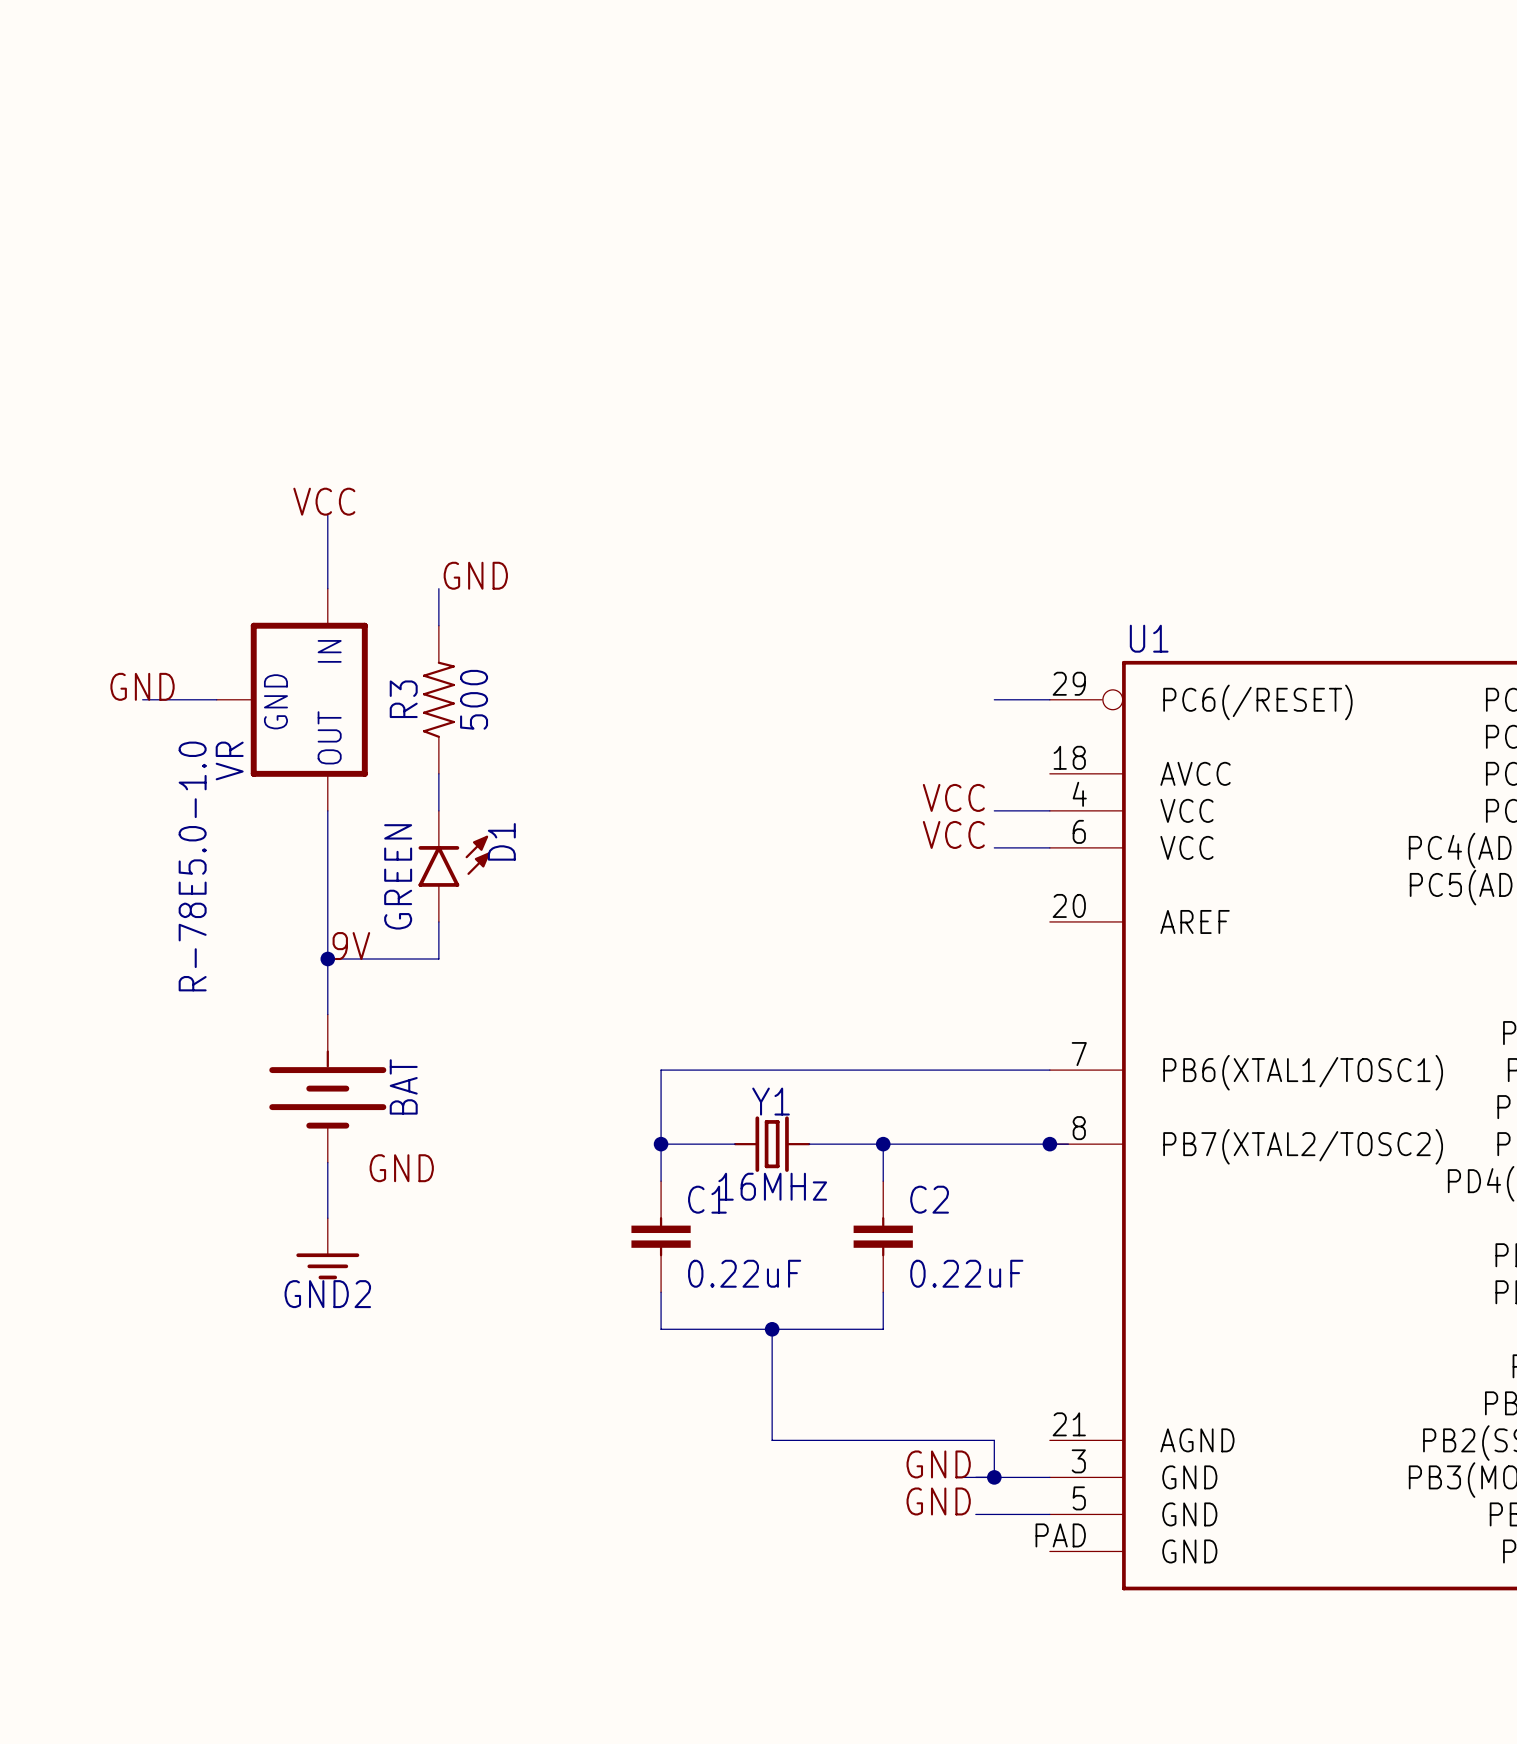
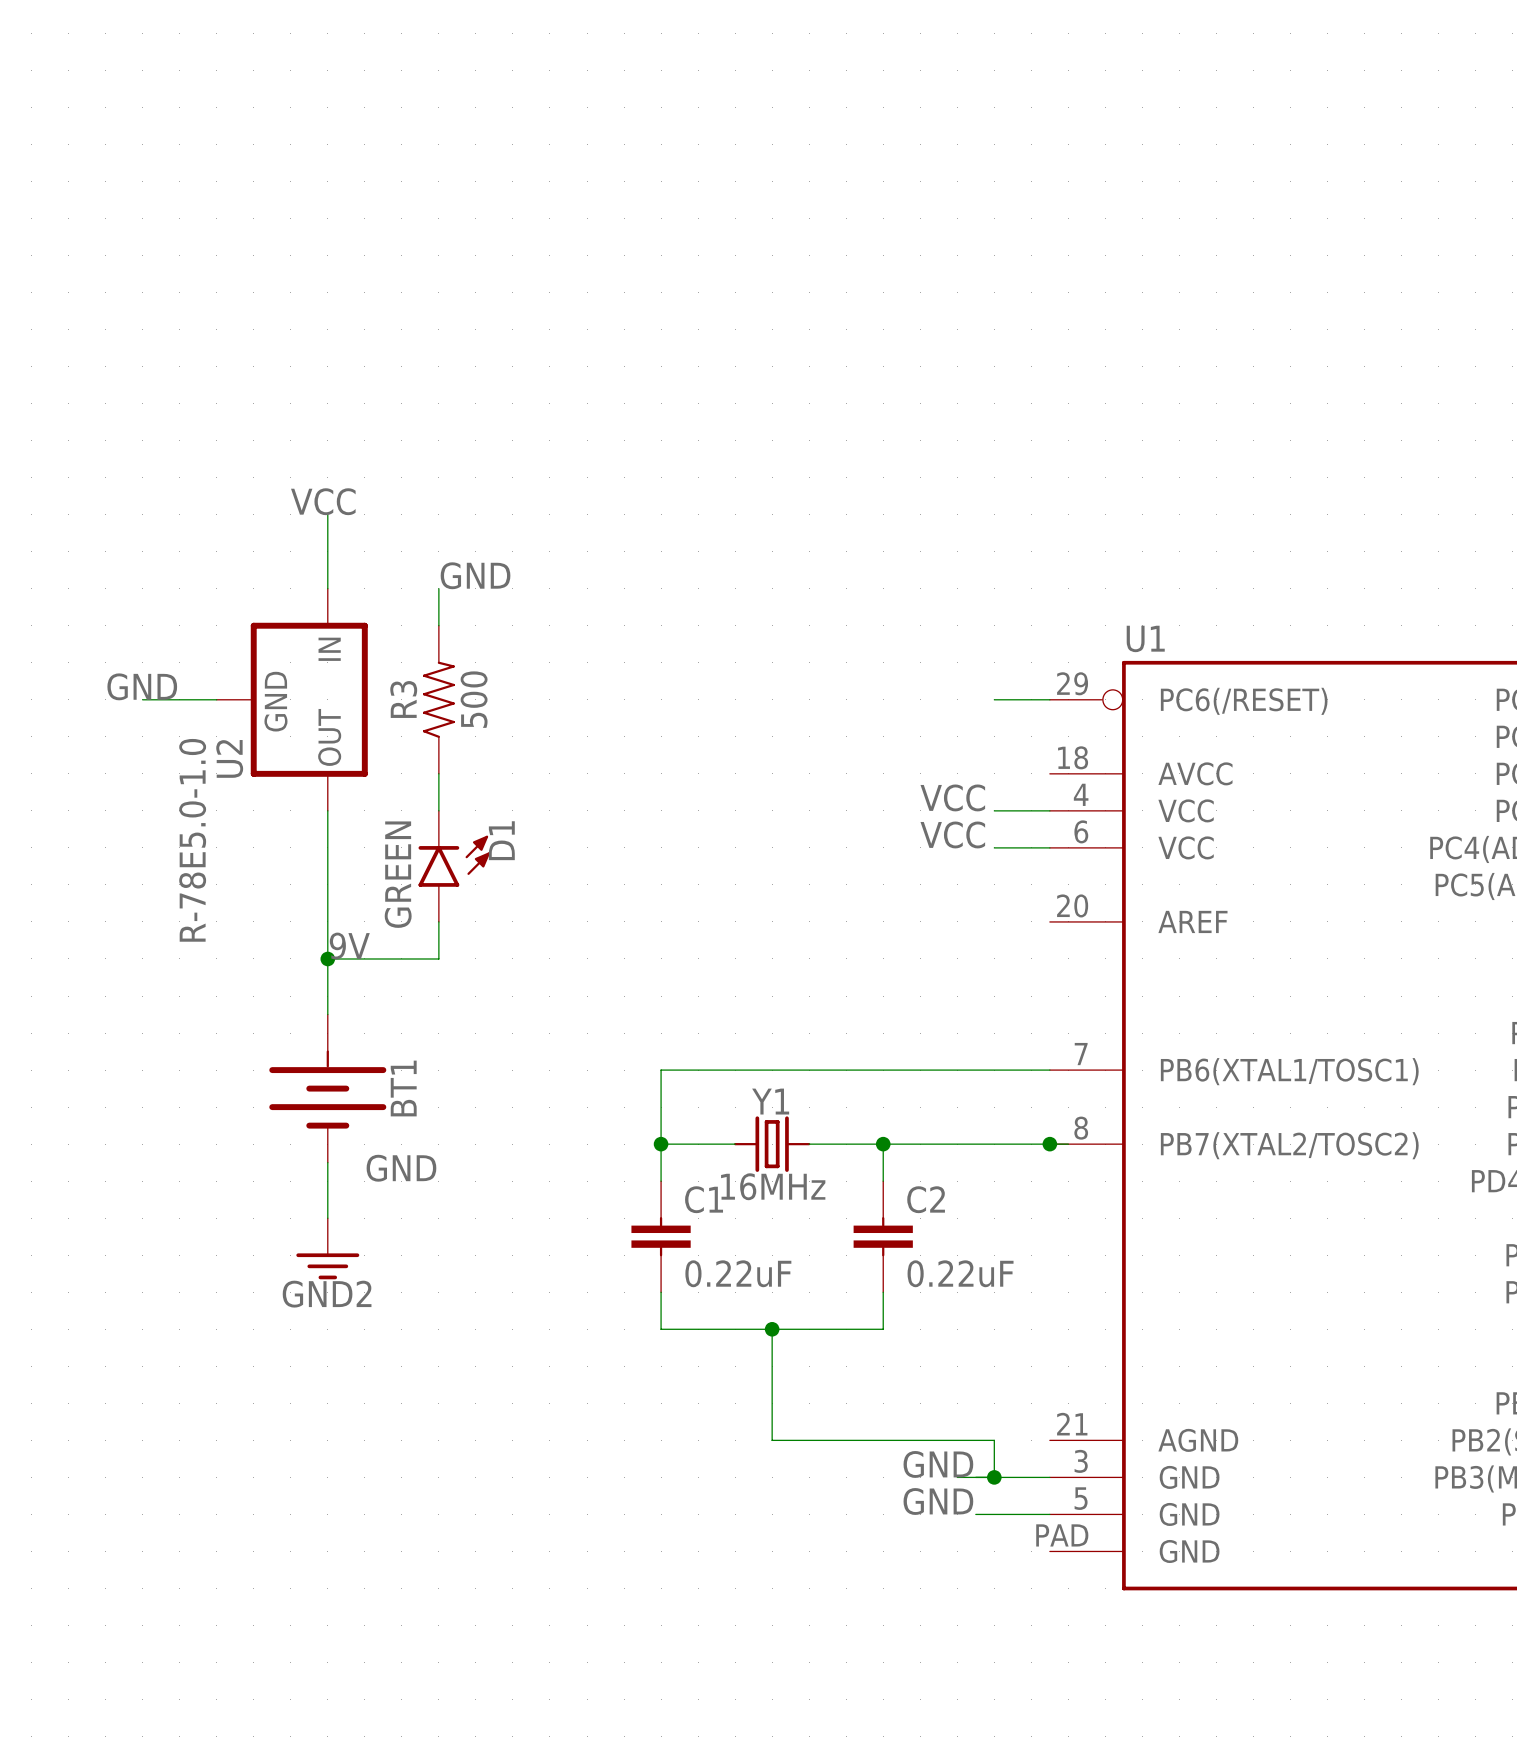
VR name: VR (229, 760) -> U2 (229, 758)
BAT name: BAT (403, 1086) -> BT1 (403, 1088)

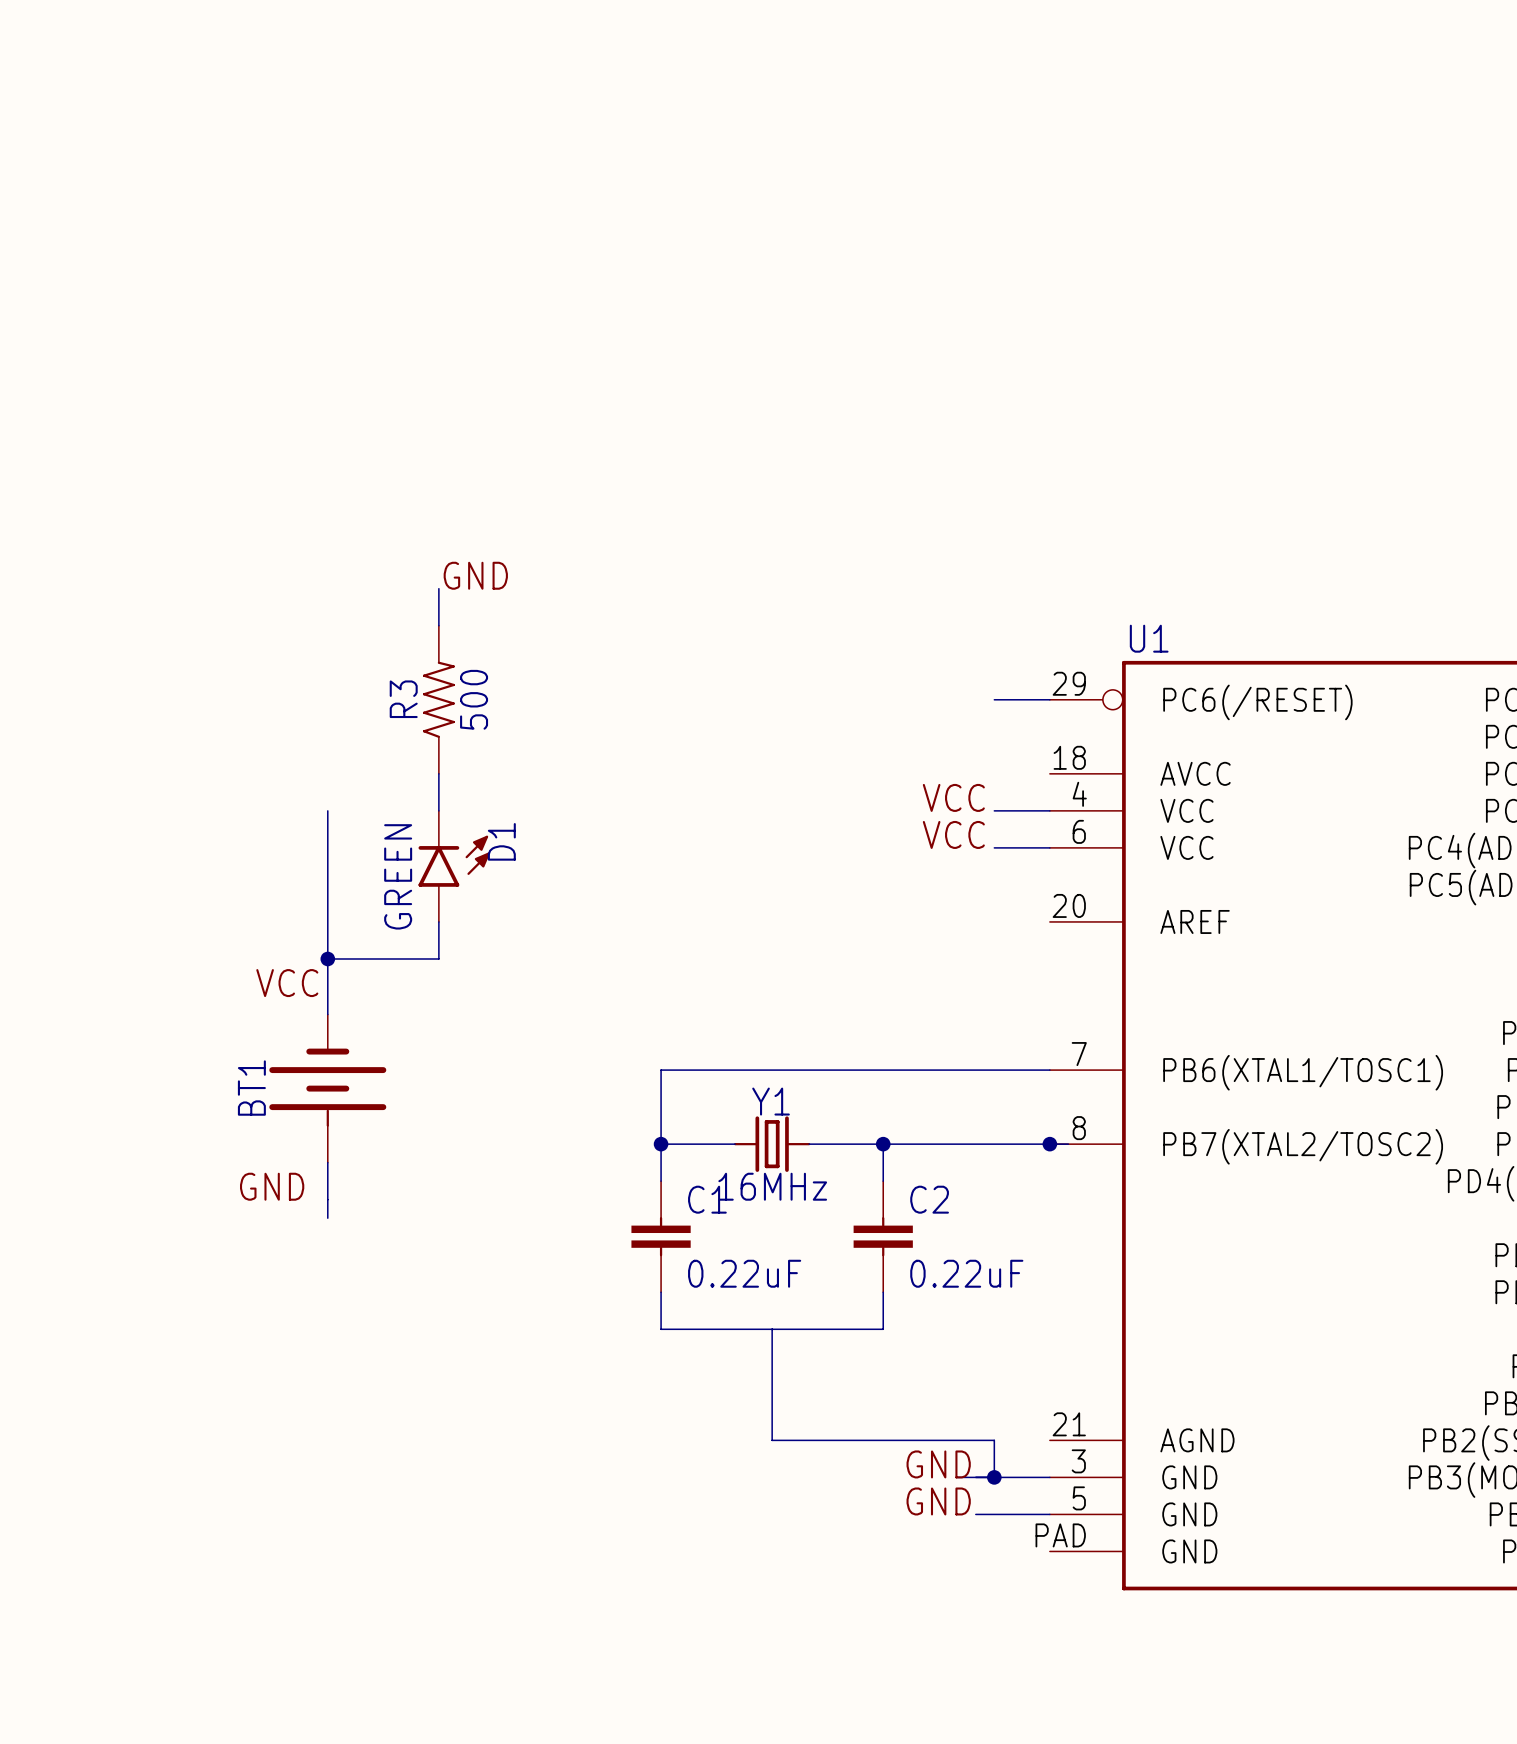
label: VCC (323, 501) -> none
wire: (327, 514) (327, 588) -> none
label: GND (142, 686) -> none
wire: (142, 699) (216, 699) -> none
U2: R-78E5.0-1.0 (292, 699) -> none
label: 9V (349, 946) -> none
label: none -> VCC (287, 983)
BT1 rotation: 0° (327, 1089) -> 180° (327, 1087)
label position: GND (401, 1168) -> GND (272, 1186)
power symbol: GND2 (327, 1248) -> none
junction: (772, 1329) -> none

